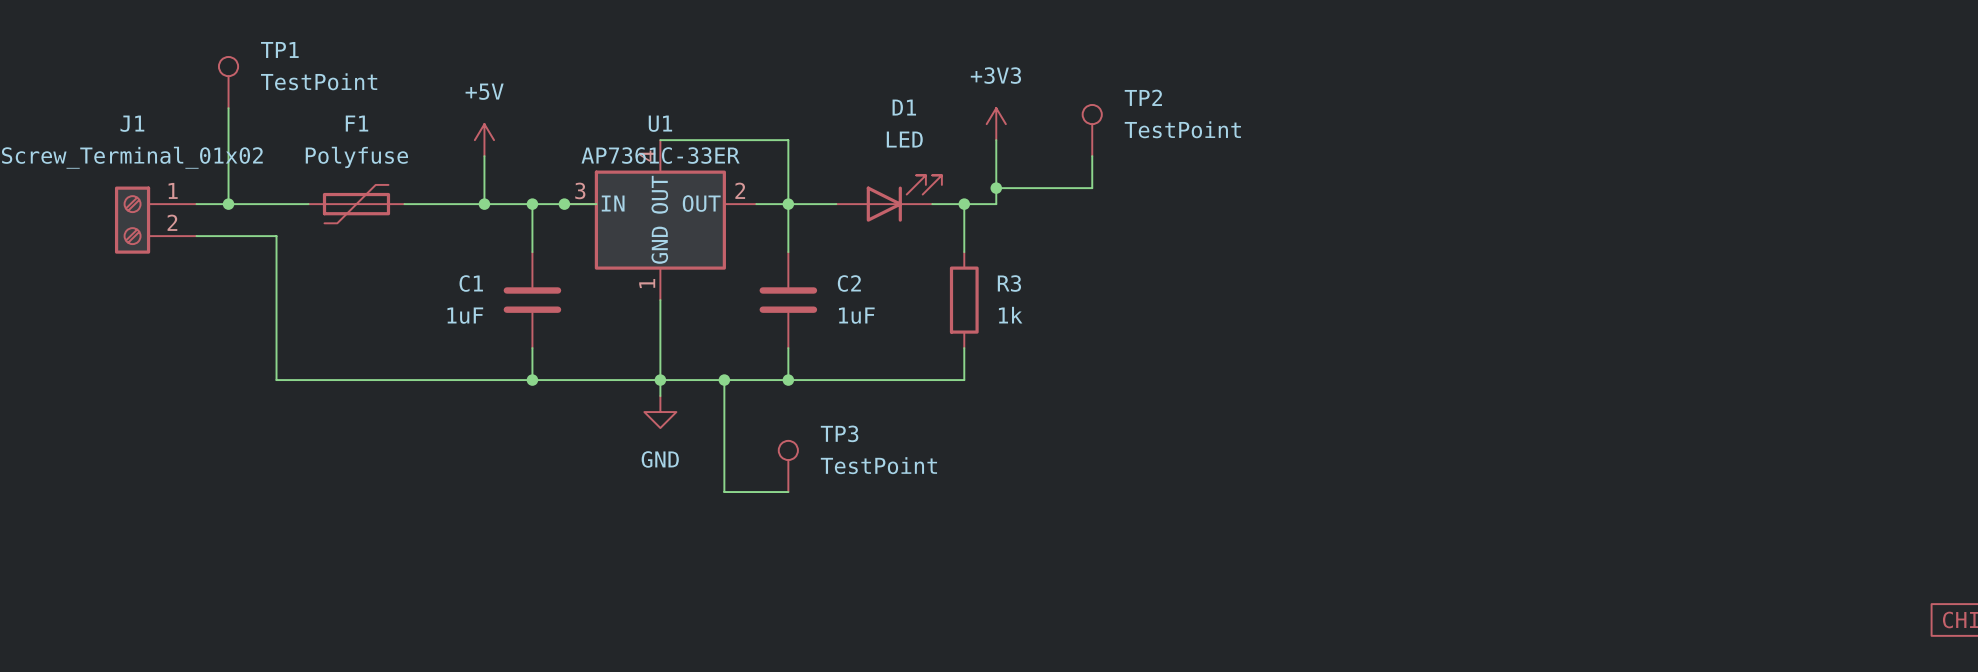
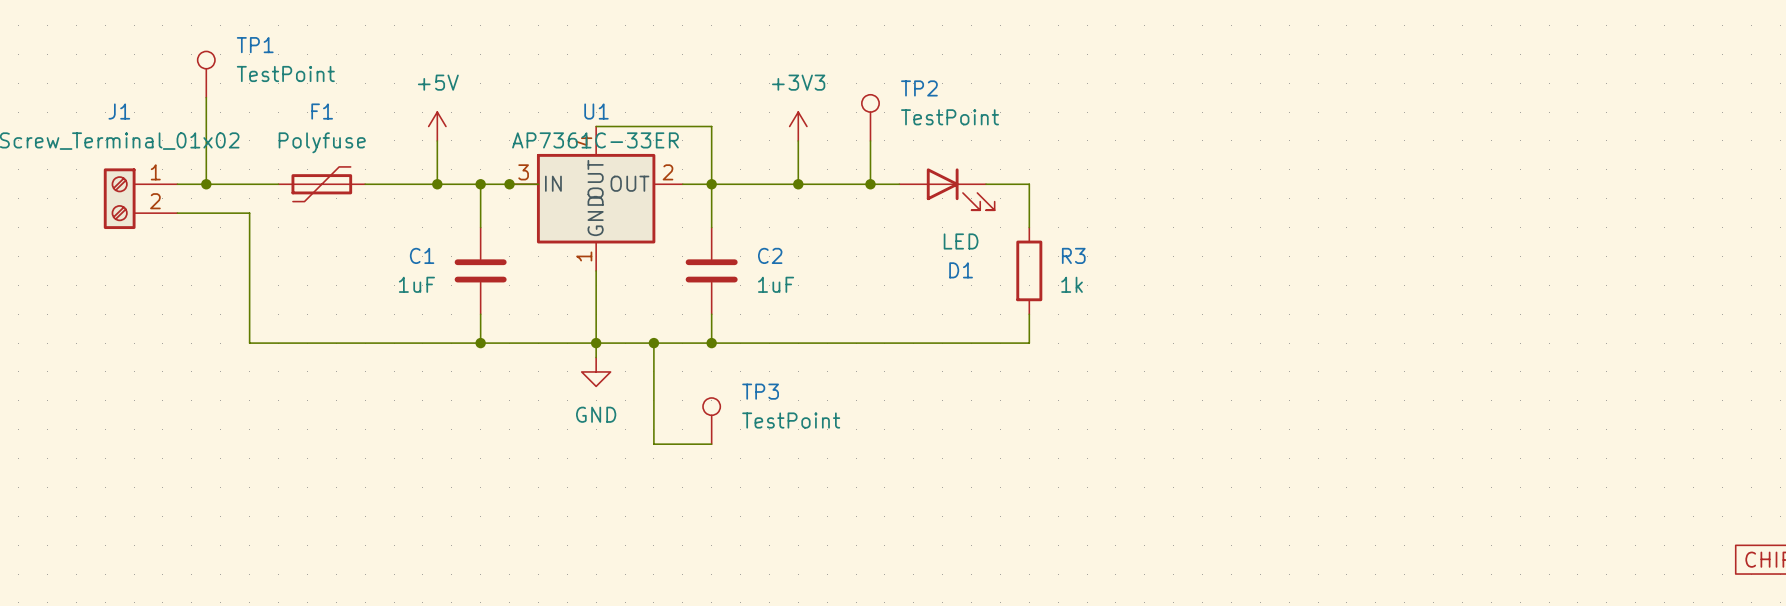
power symbol position: +3V3 (996, 124) -> +3V3 (798, 126)
TP2 position: (1092, 130) -> (870, 117)
wire: (996, 140) (996, 204) -> none
wire: none -> (798, 140) (798, 184)
wire: (1092, 156) (1092, 188) (996, 188) -> none
junction: (996, 188) -> none
D1 position: (889, 198) -> (947, 189)
D1 flip: as is (904, 198) -> up-down (960, 189)
junction: none -> (798, 184)
wire: (964, 204) (964, 252) -> (870, 184) (870, 140)
wire: none -> (986, 184) (1029, 184) (1029, 227)
R3 position: (964, 300) -> (1029, 270)
wire: (964, 348) (964, 380) -> (1029, 314) (1029, 343) (870, 343)

